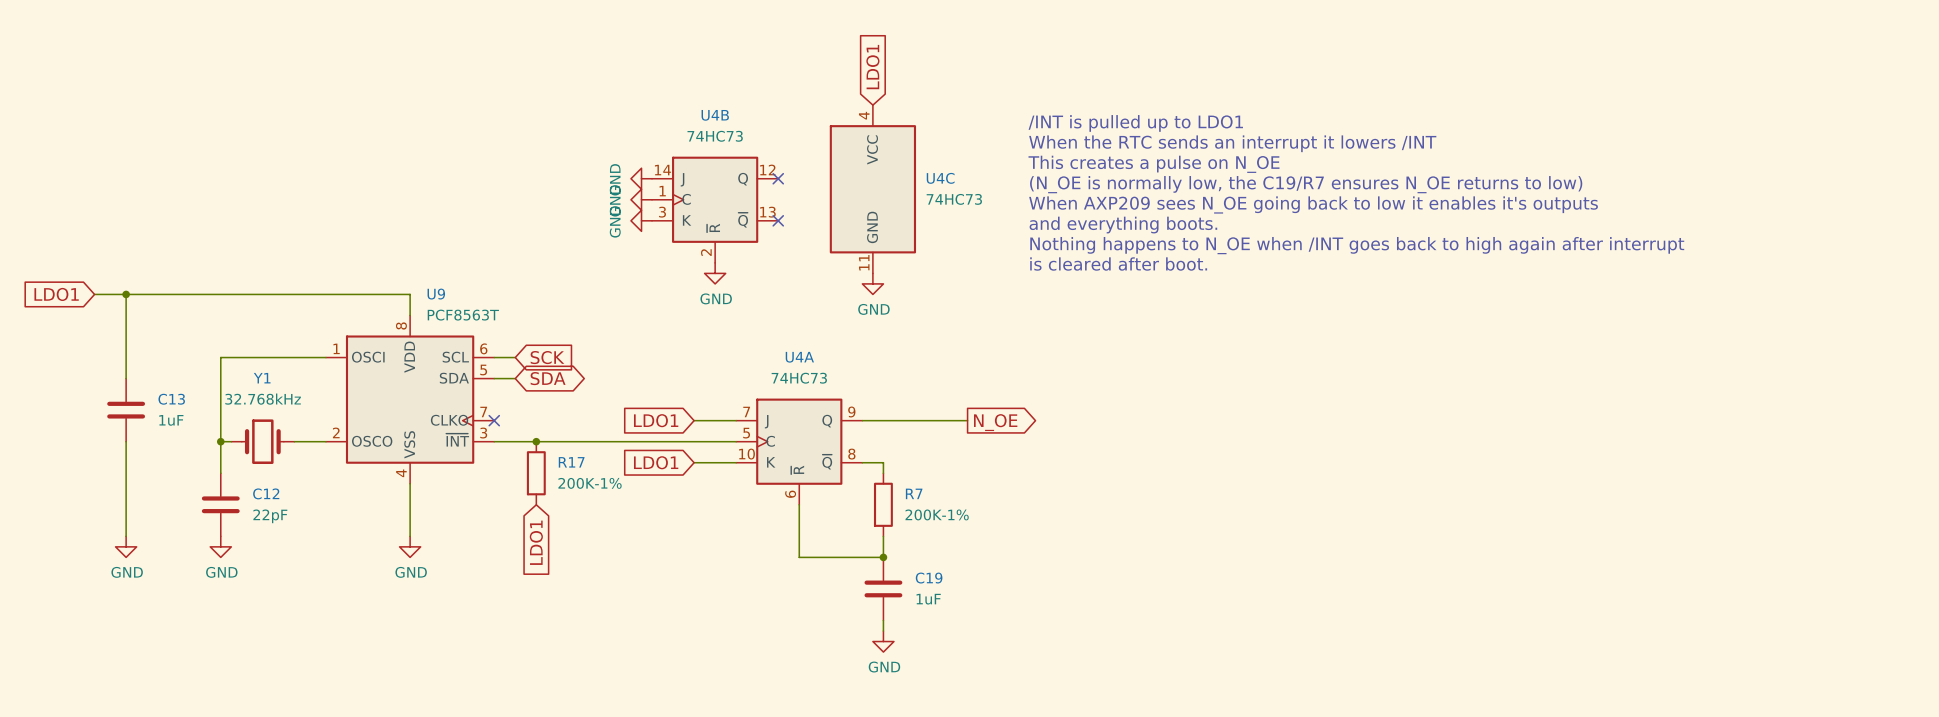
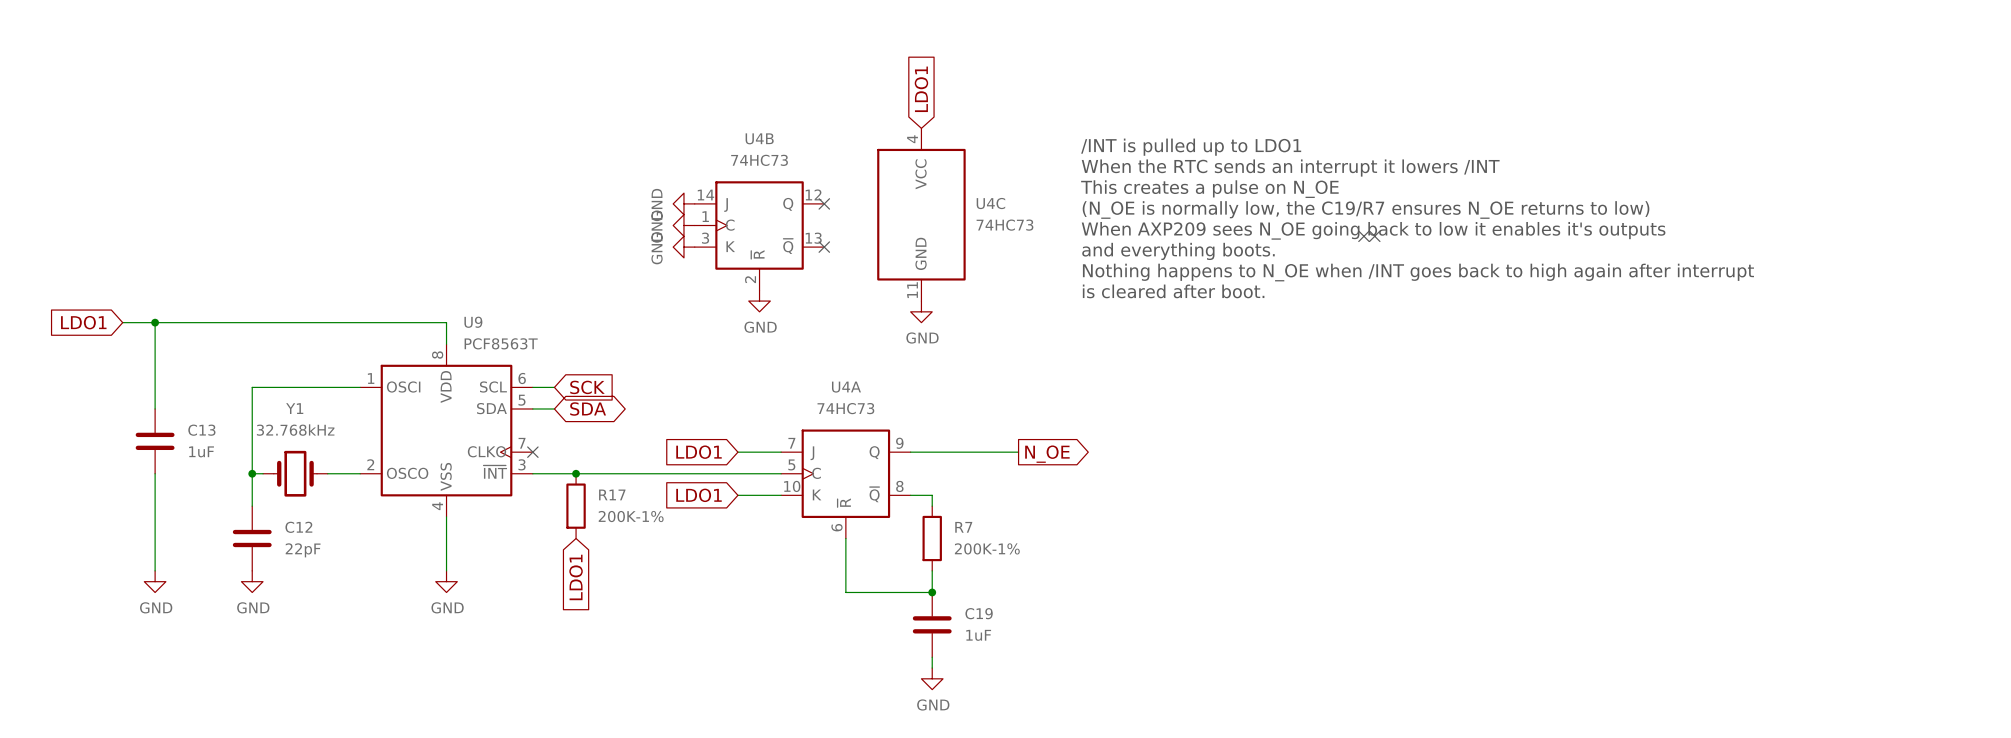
no-connect mark: none -> (1363, 236)
no-connect mark: none -> (1374, 236)

